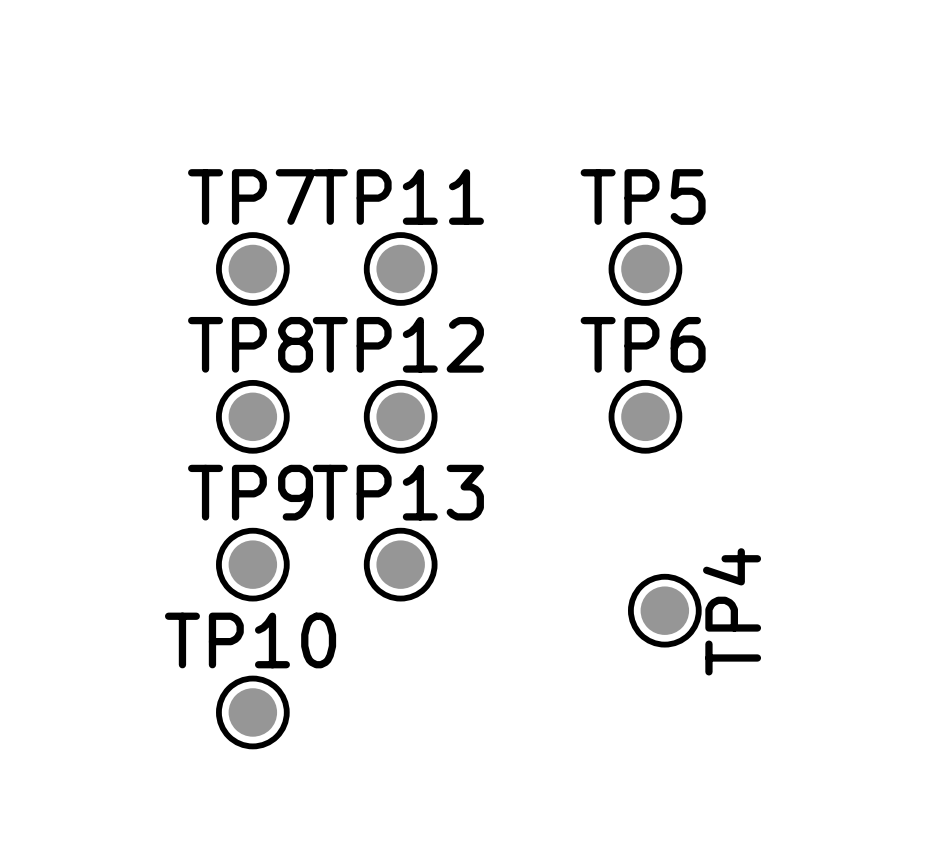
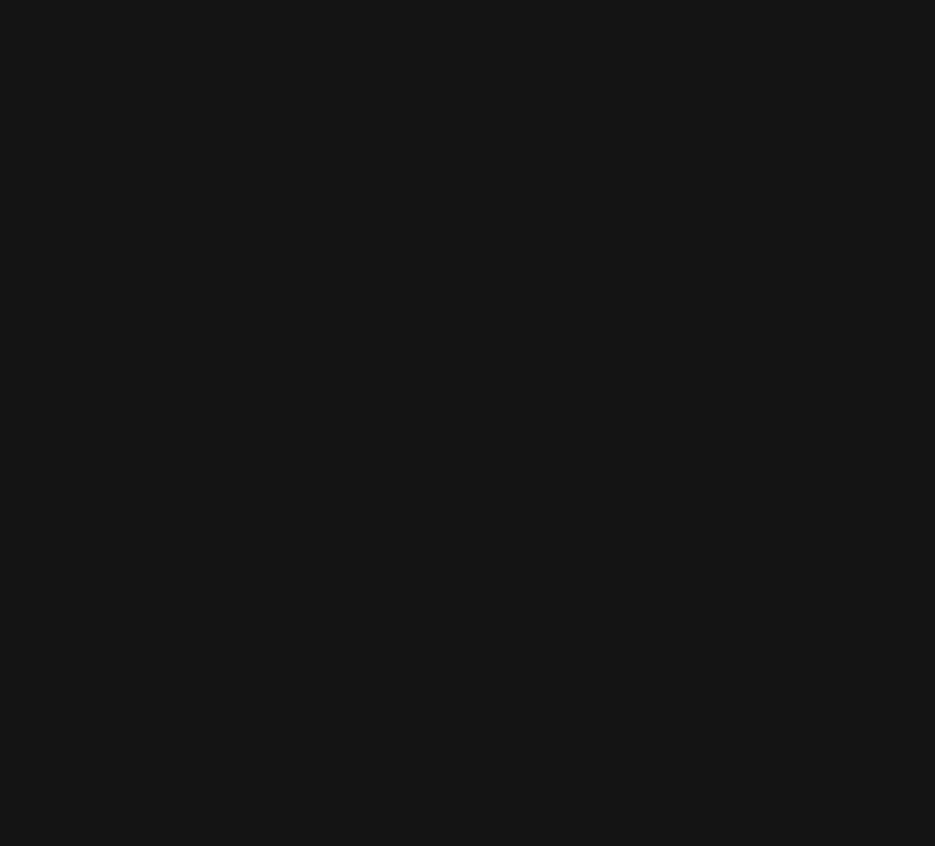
TP7: (252, 268) -> none
TP11: (400, 268) -> none
TP5: (645, 268) -> none
TP8: (252, 416) -> none
TP12: (400, 416) -> none
TP6: (645, 416) -> none
TP9: (252, 564) -> none
TP13: (400, 564) -> none
TP4: (664, 610) -> none
TP10: (252, 712) -> none

